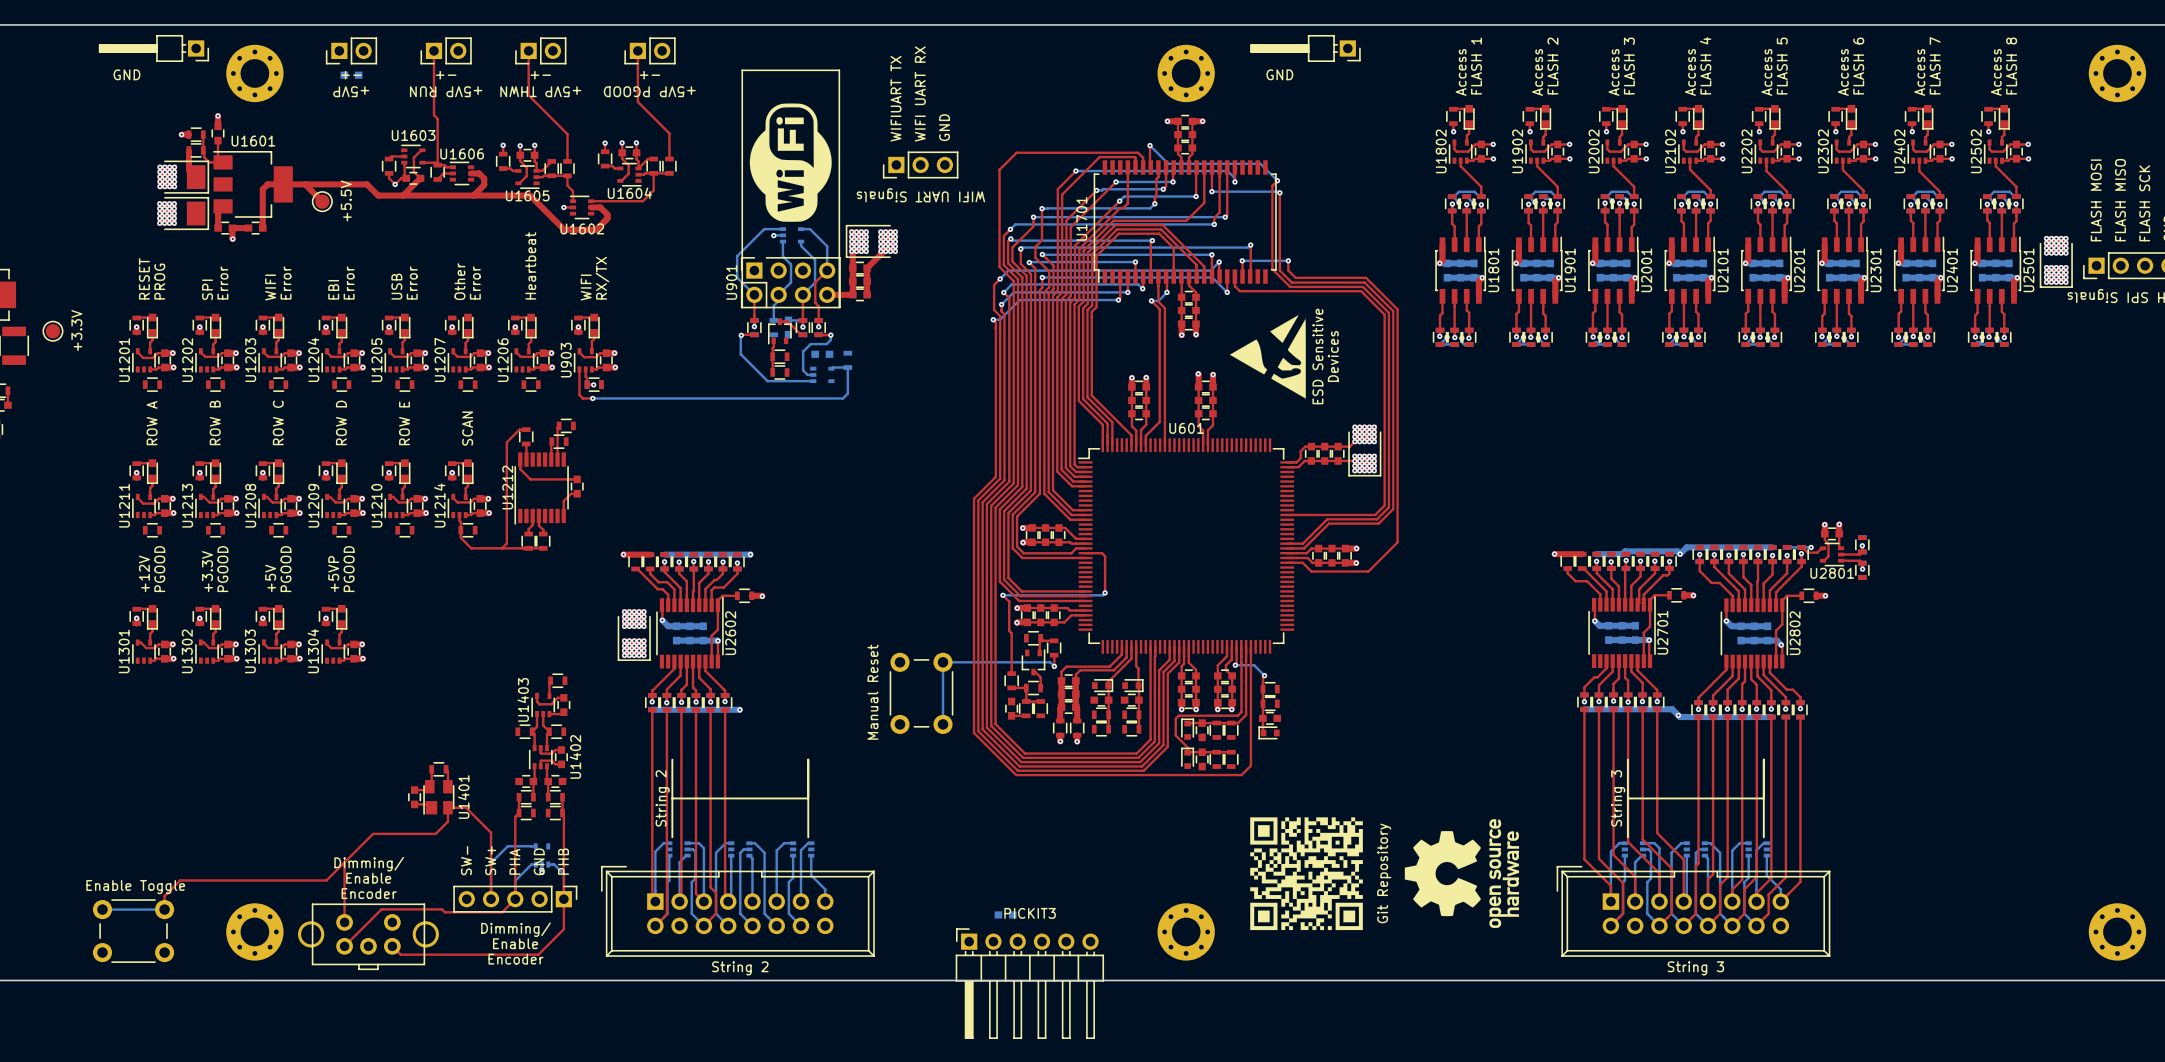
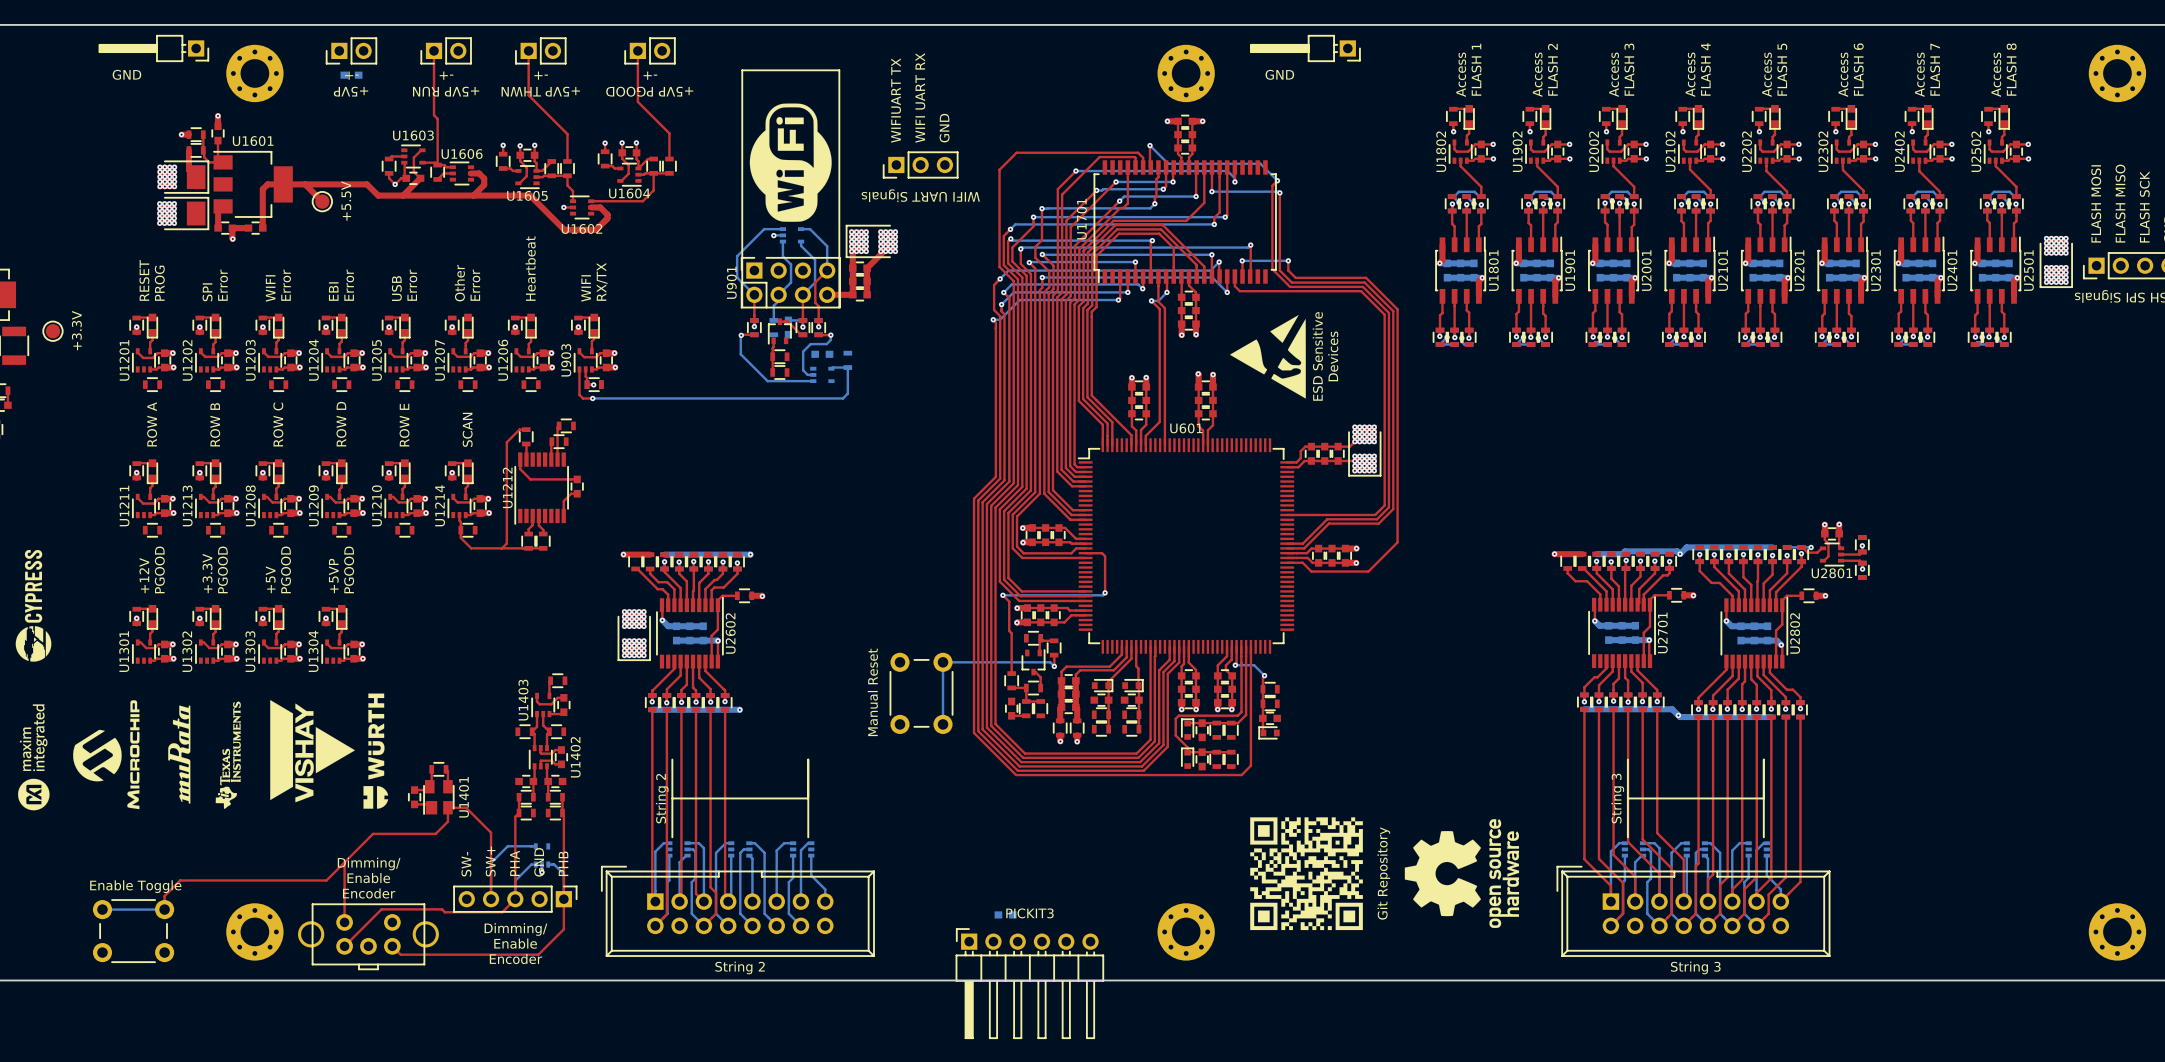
drawing: none -> [15, 549, 52, 662]
drawing: none -> [270, 693, 389, 809]
drawing: none -> [73, 700, 140, 810]
drawing: none -> [215, 701, 241, 809]
drawing: none -> [18, 704, 50, 811]
drawing: none -> [168, 705, 191, 804]

